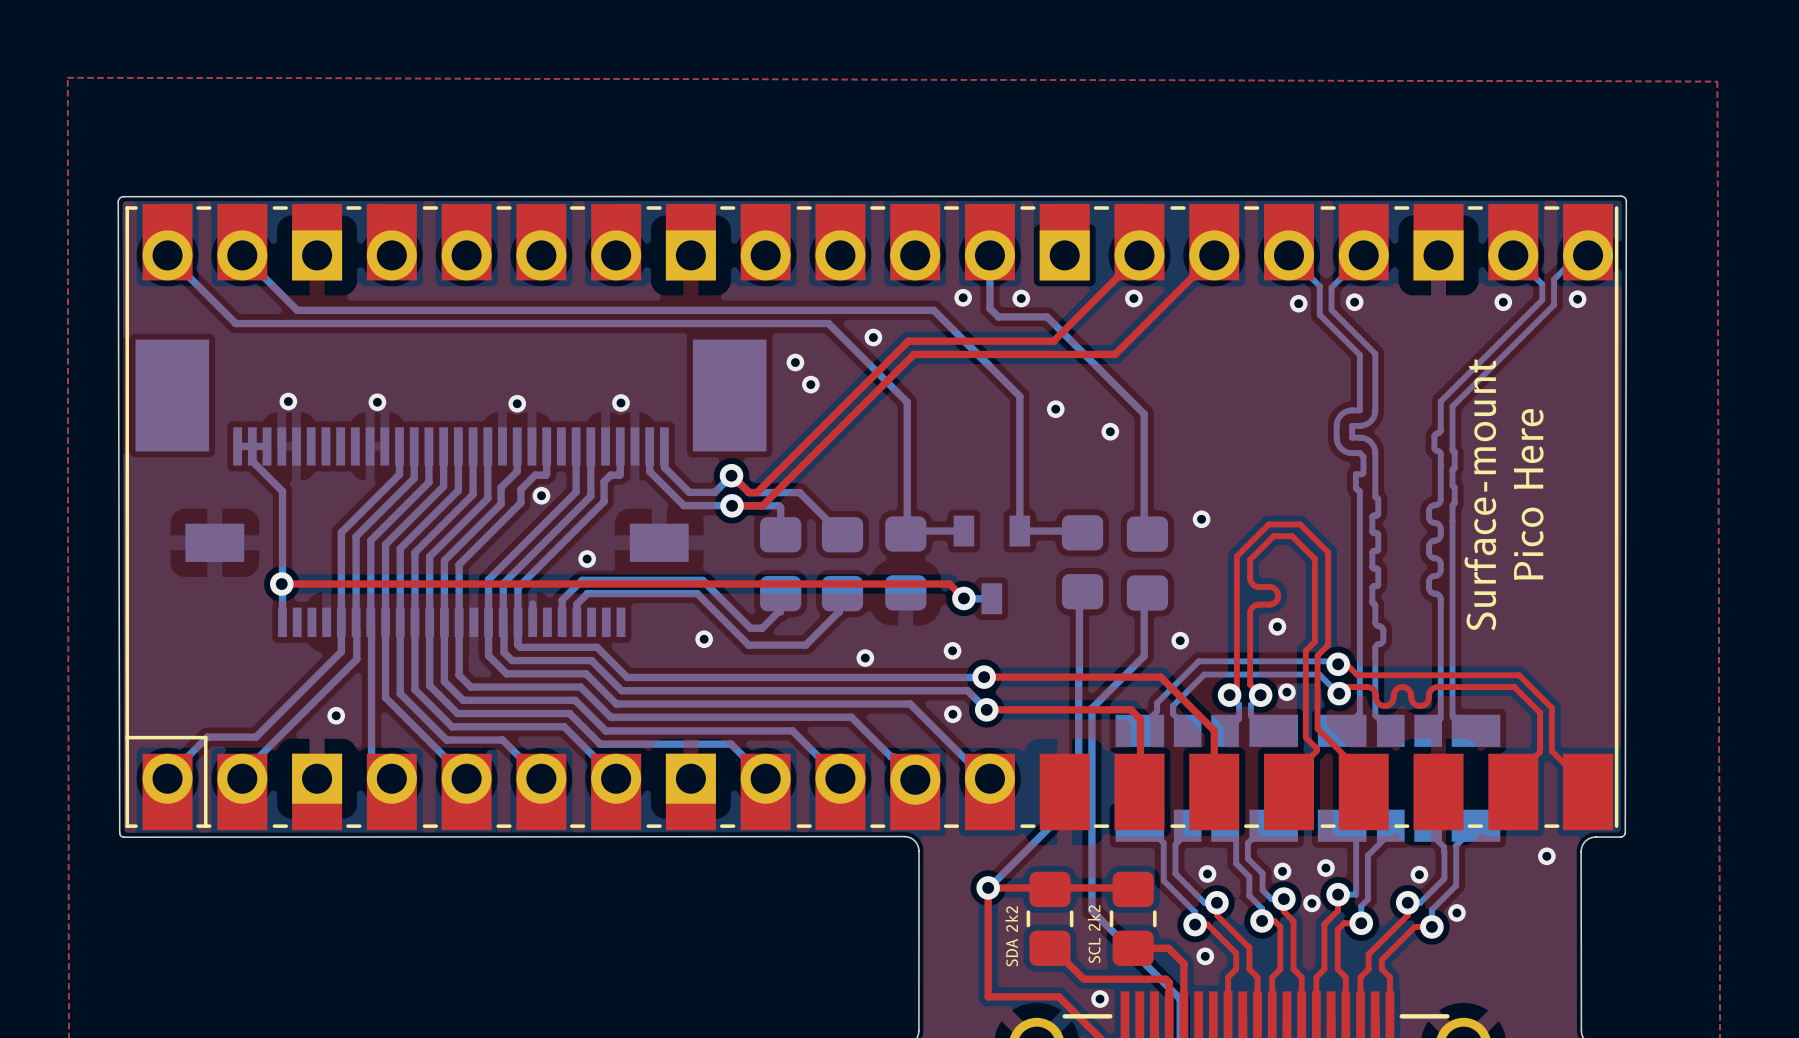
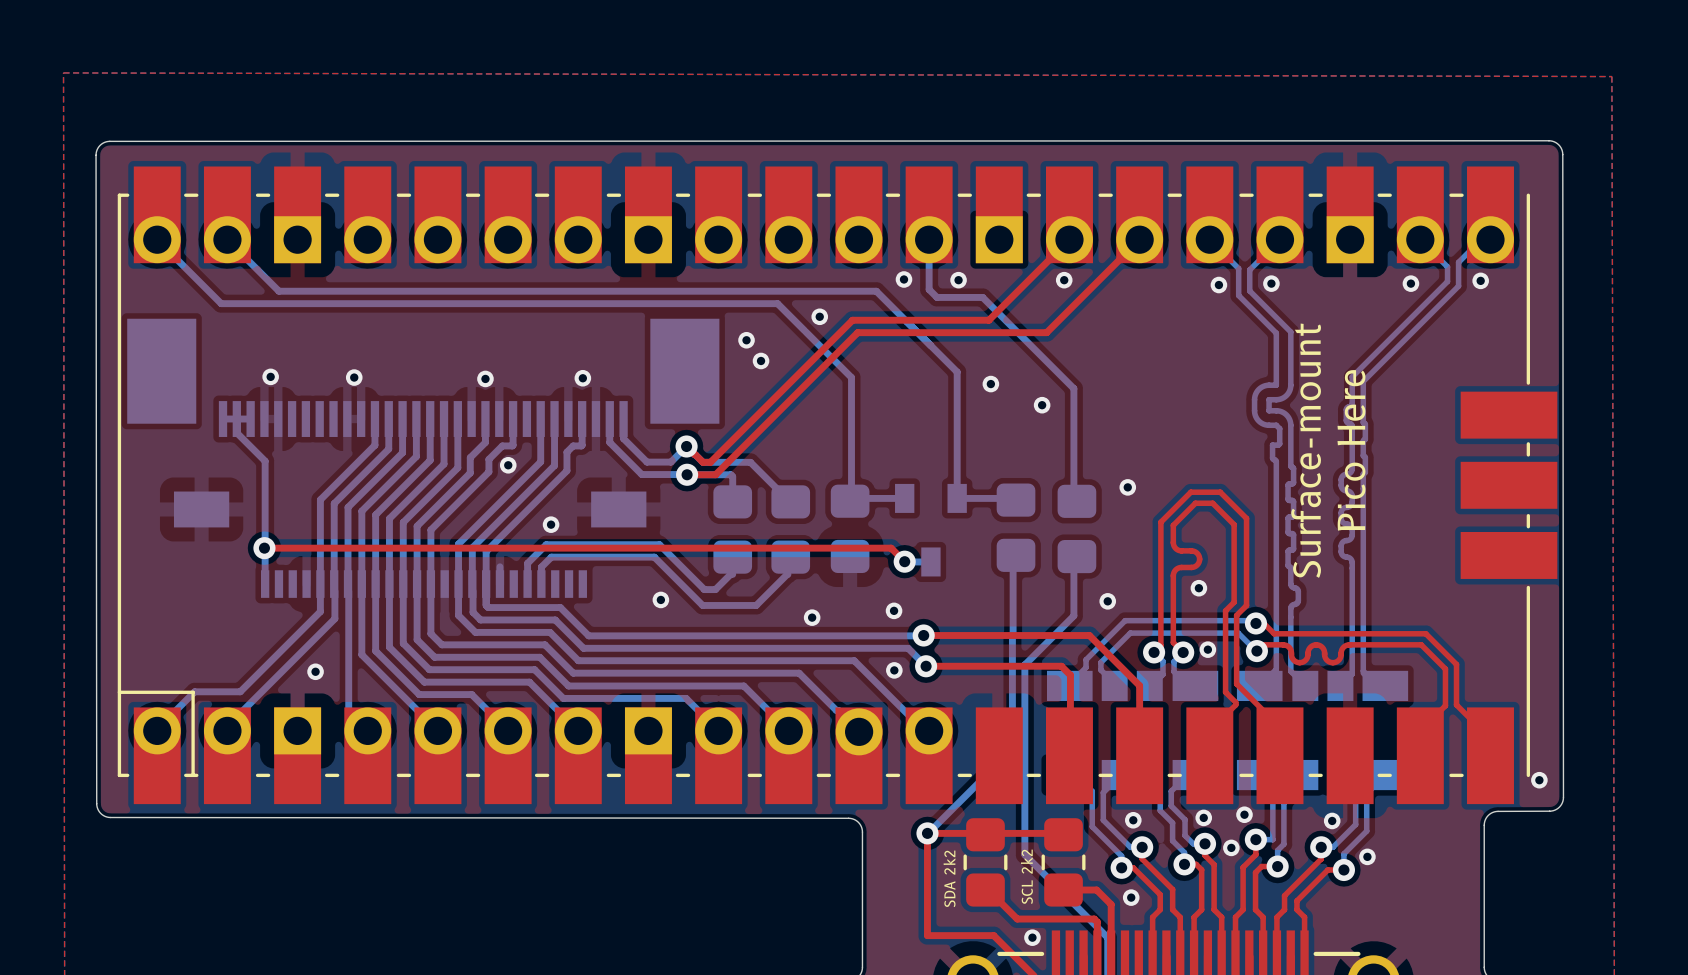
part footprint: [125, 203, 1619, 831] -> [117, 166, 1558, 805]
text position: Surface-mount (1480, 494) -> Surface-mount (1306, 450)
text position: Pico Here (1528, 494) -> Pico Here (1351, 450)
via position: (1546, 856) -> (1539, 780)
board edge: (918, 1030) (919, 851) (915, 842) (908, 837) (121, 836) (118, 201) (120, 198) (1623, 196) (1626, 201) (1625, 833) (1621, 837) (1592, 837) (1585, 841) (1581, 847) (1581, 1030) -> (862, 967) (862, 830) (859, 823) (852, 818) (110, 817) (100, 813) (96, 803) (96, 155) (100, 145) (109, 141) (1548, 140) (1555, 142) (1560, 147) (1562, 154) (1563, 799) (1559, 807) (1553, 810) (1496, 811) (1489, 814) (1485, 819) (1484, 967)

